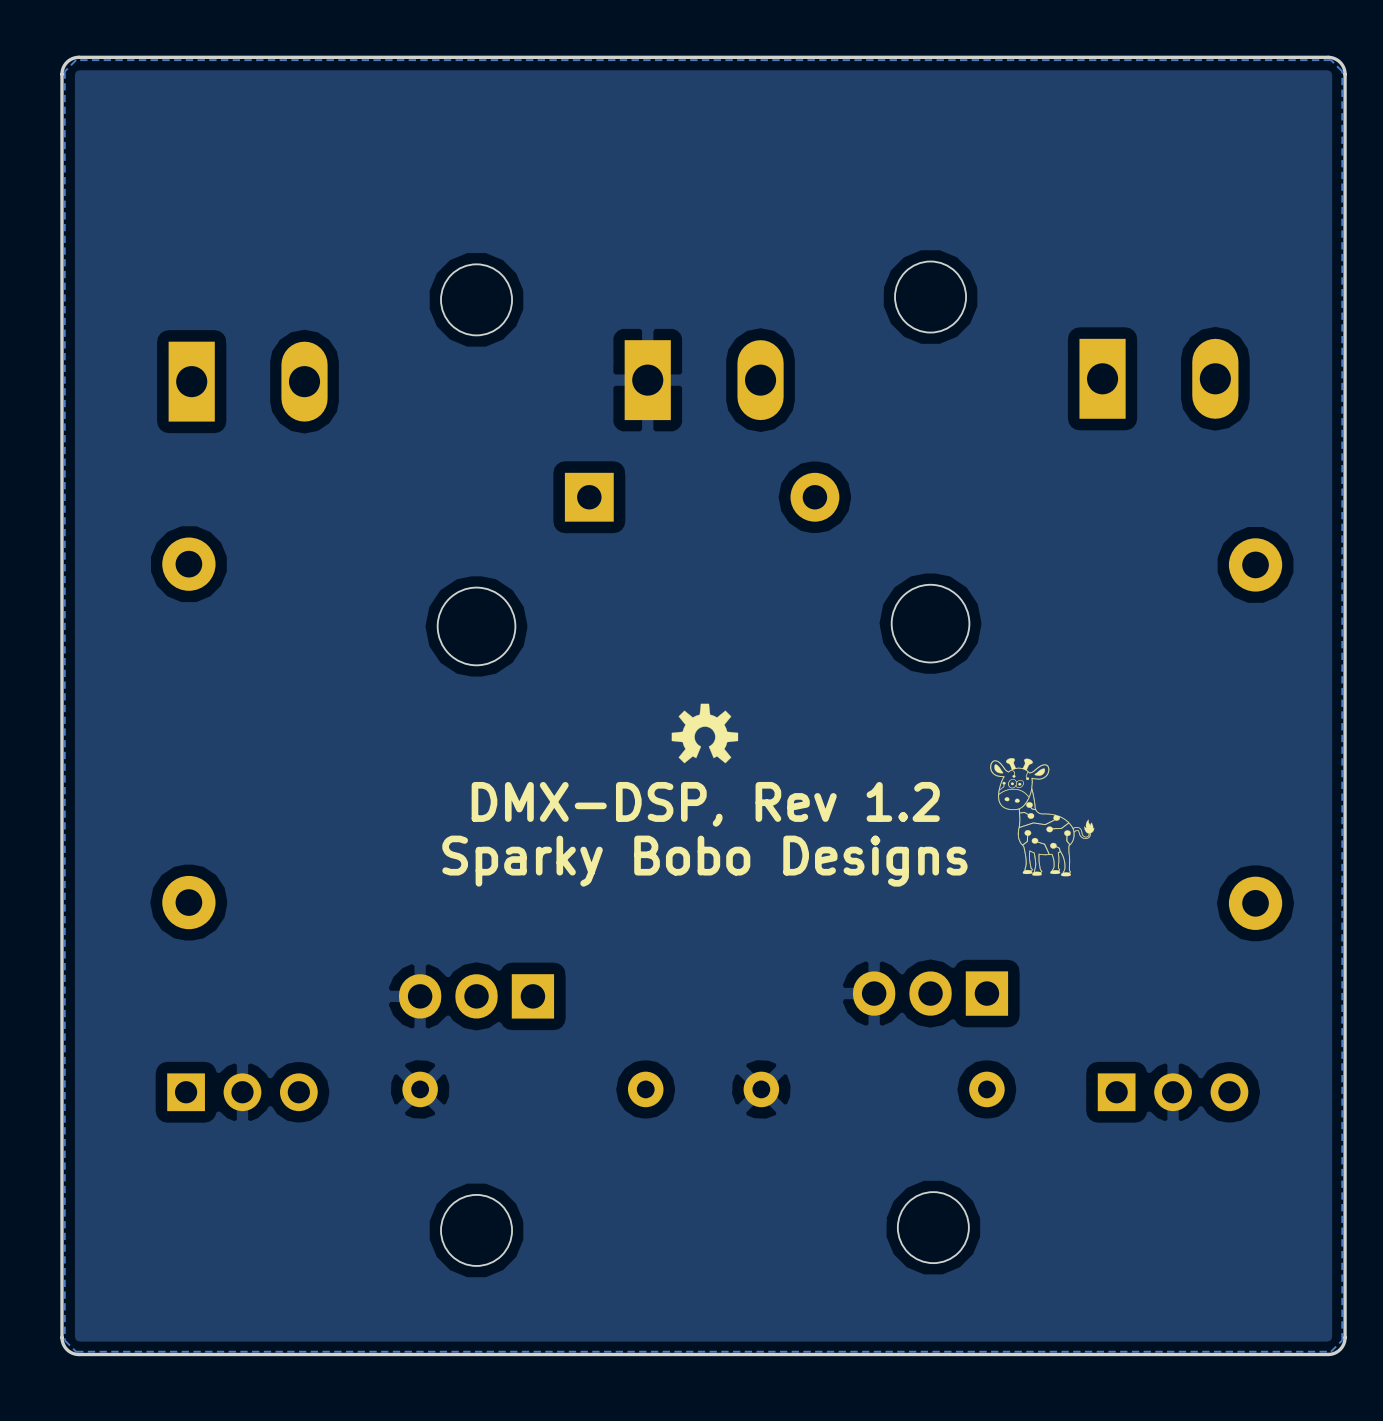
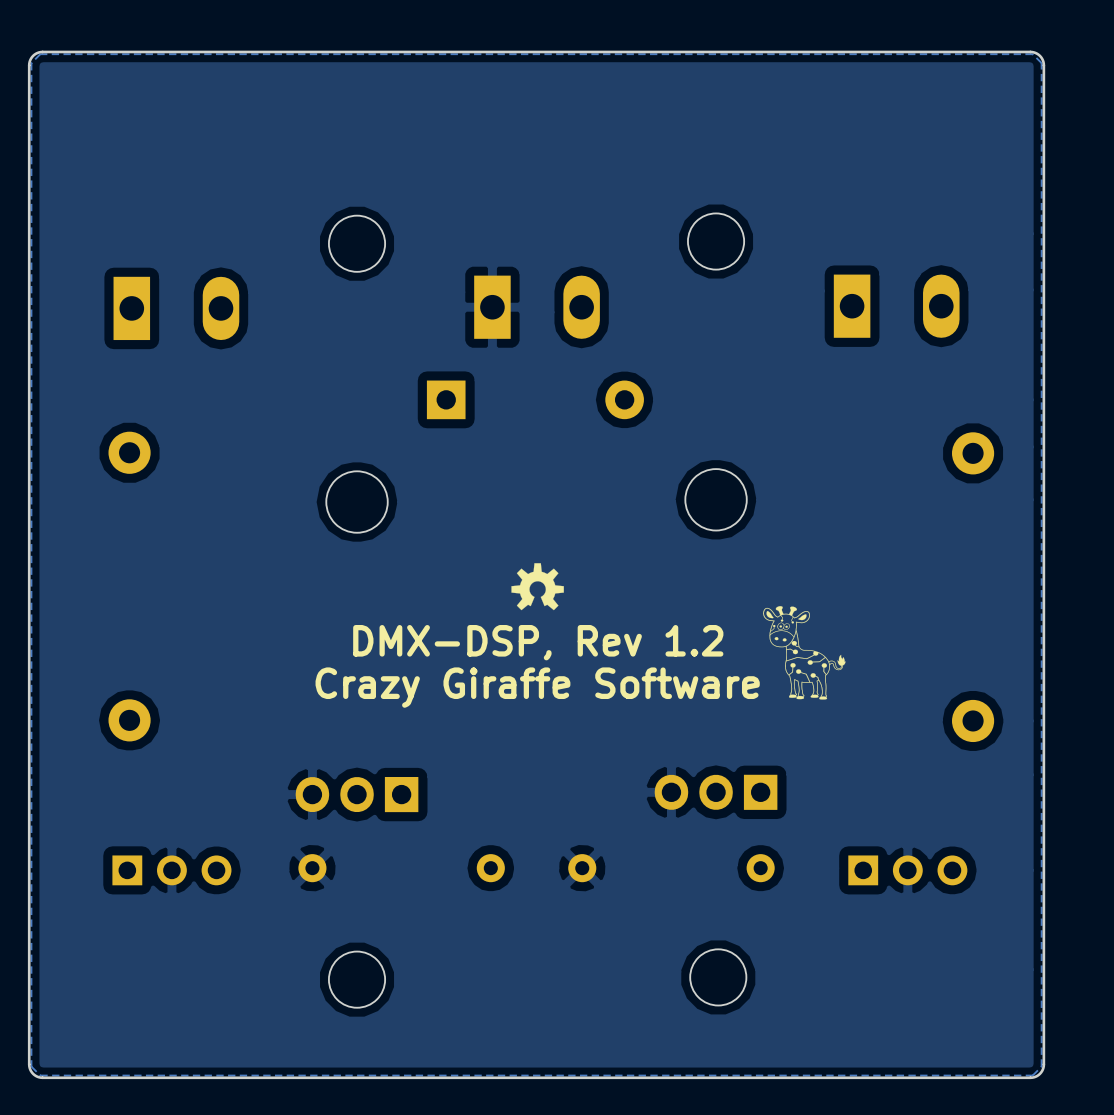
text: Sparky Bobo Designs (704, 861) -> Crazy Giraffe Software (537, 687)

